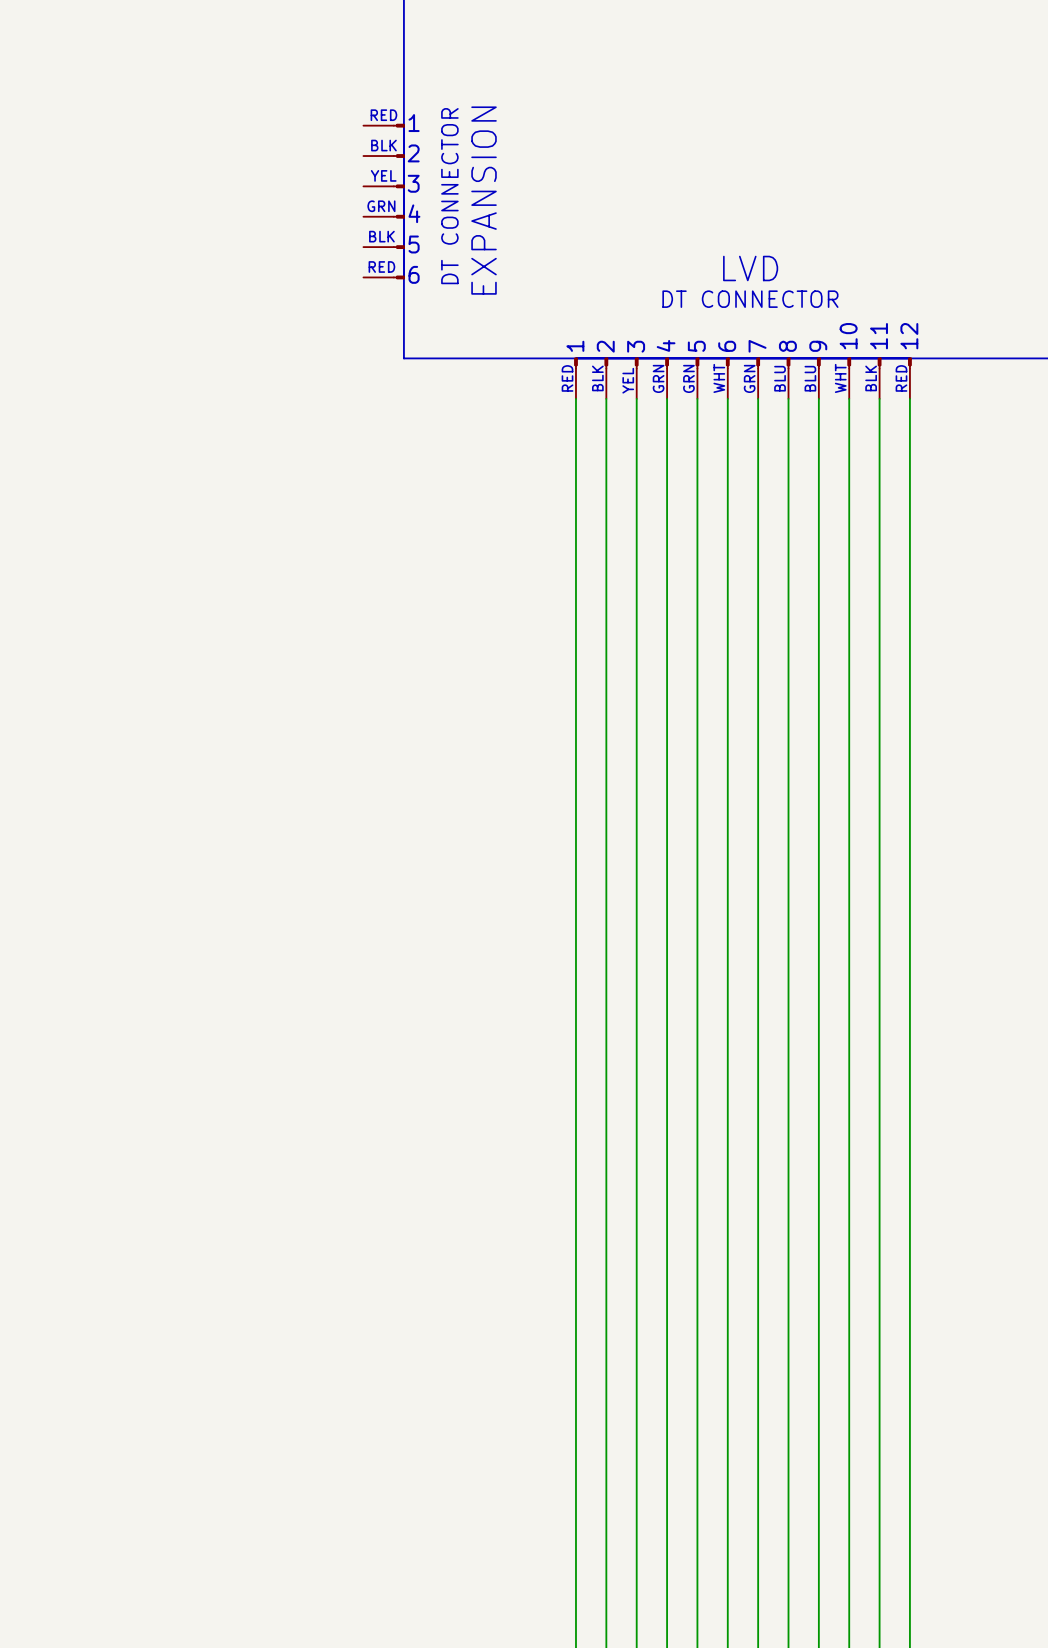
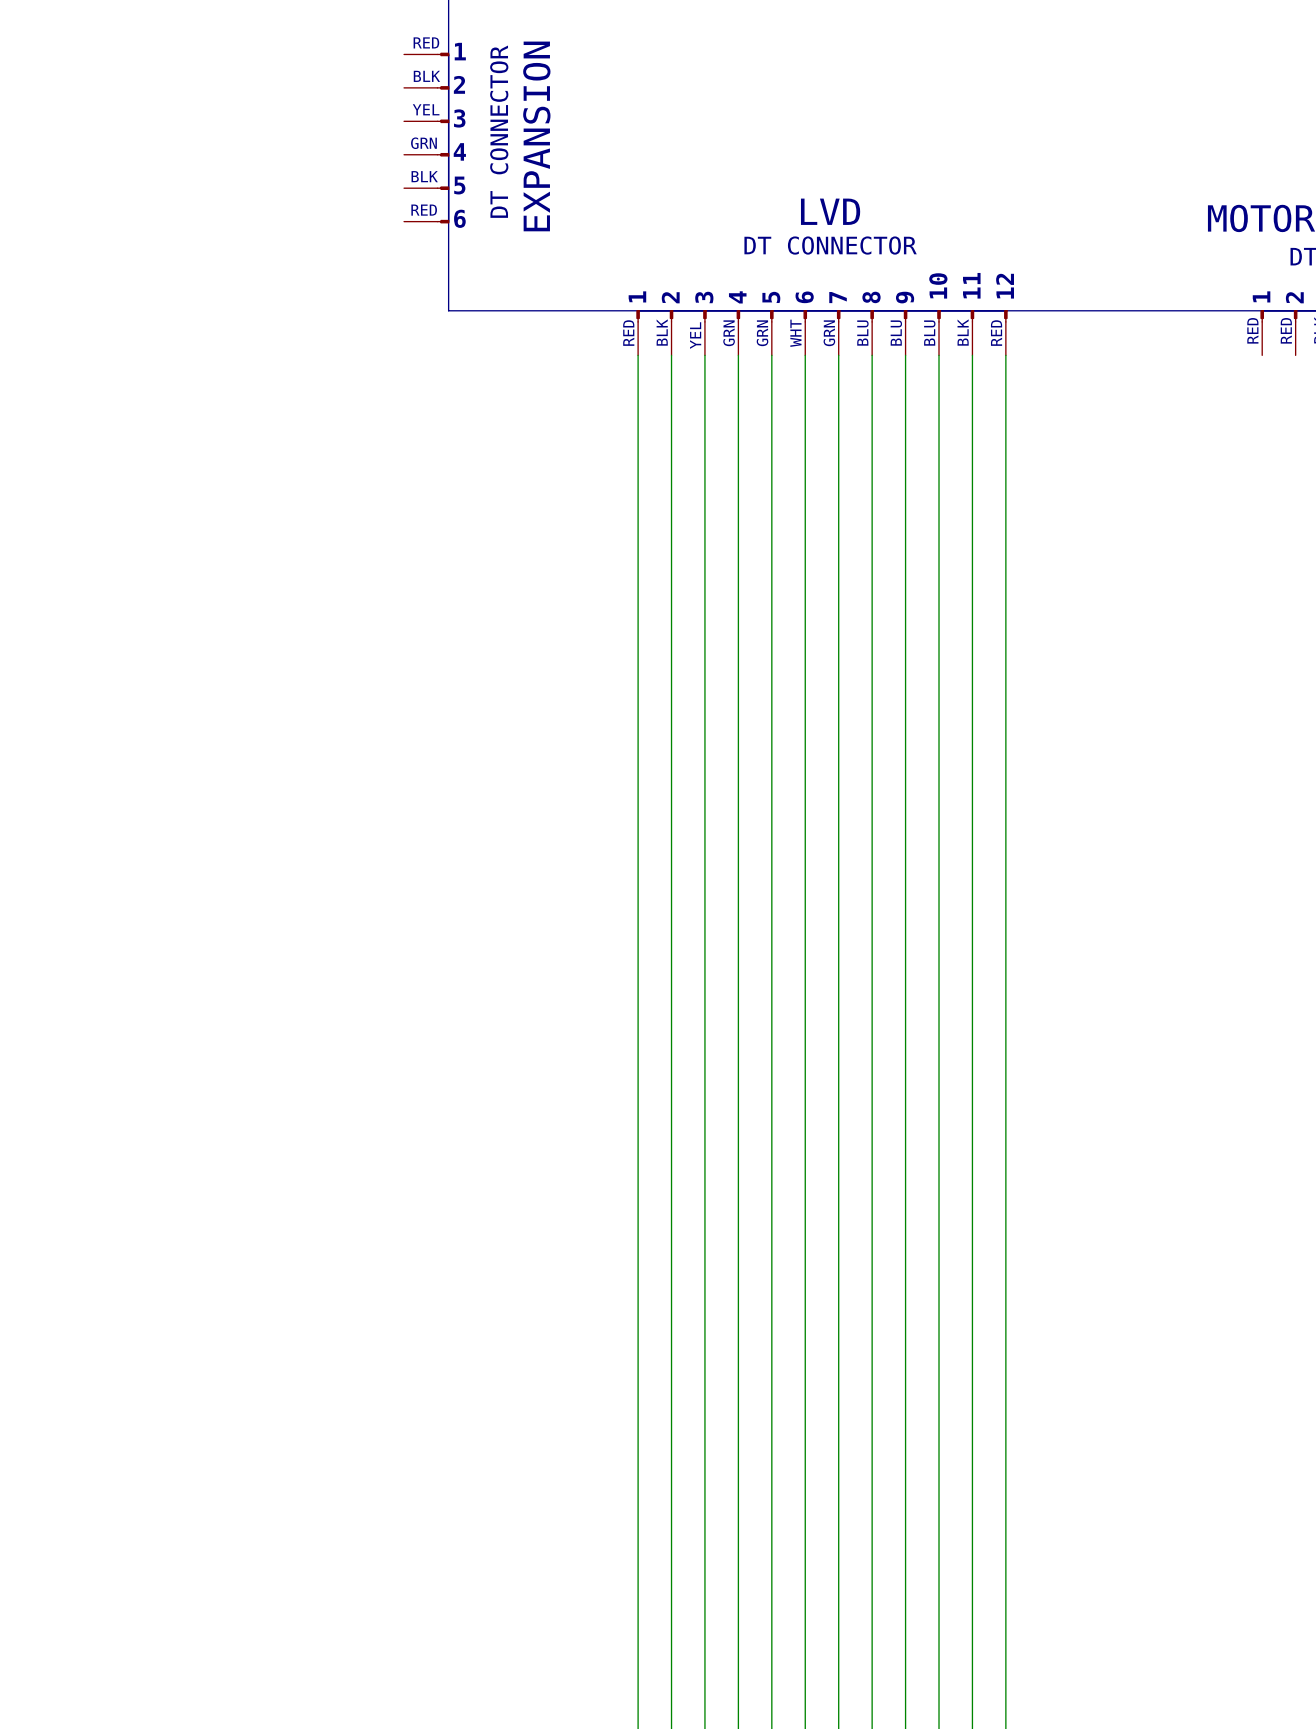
text: WHT (840, 378) -> BLU (929, 333)

